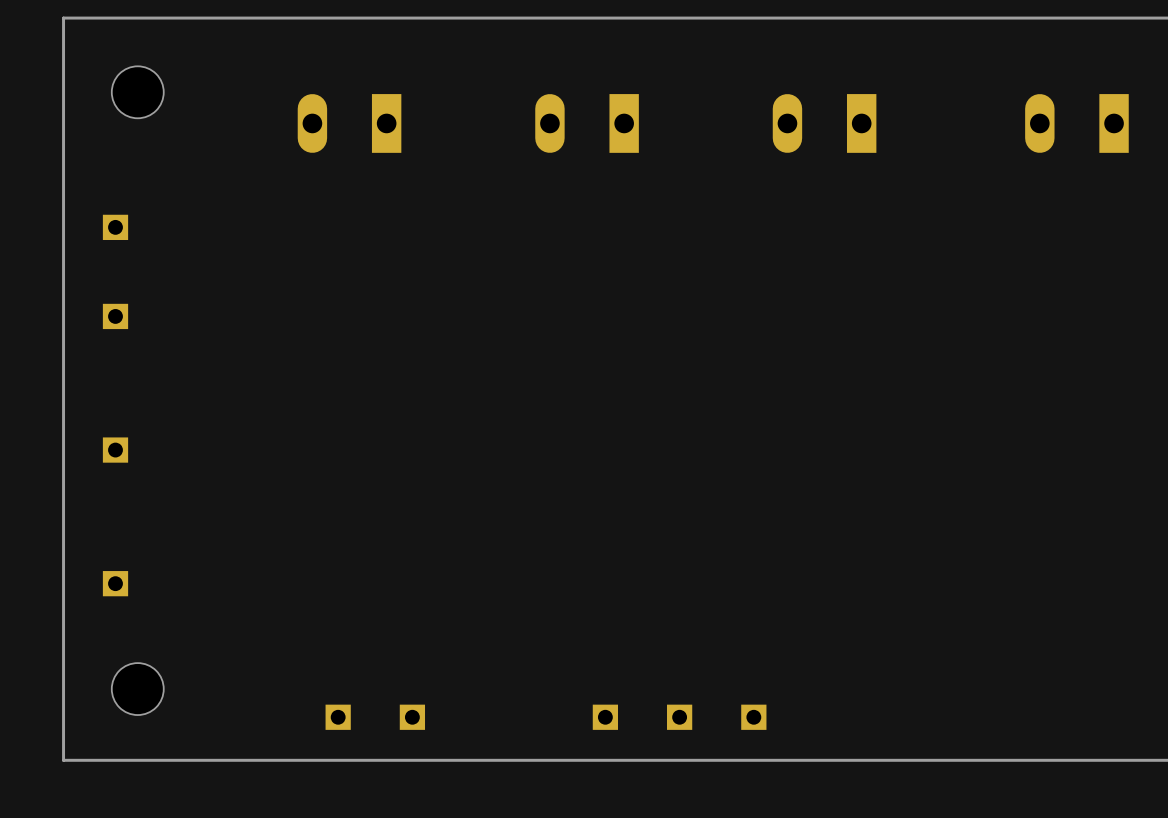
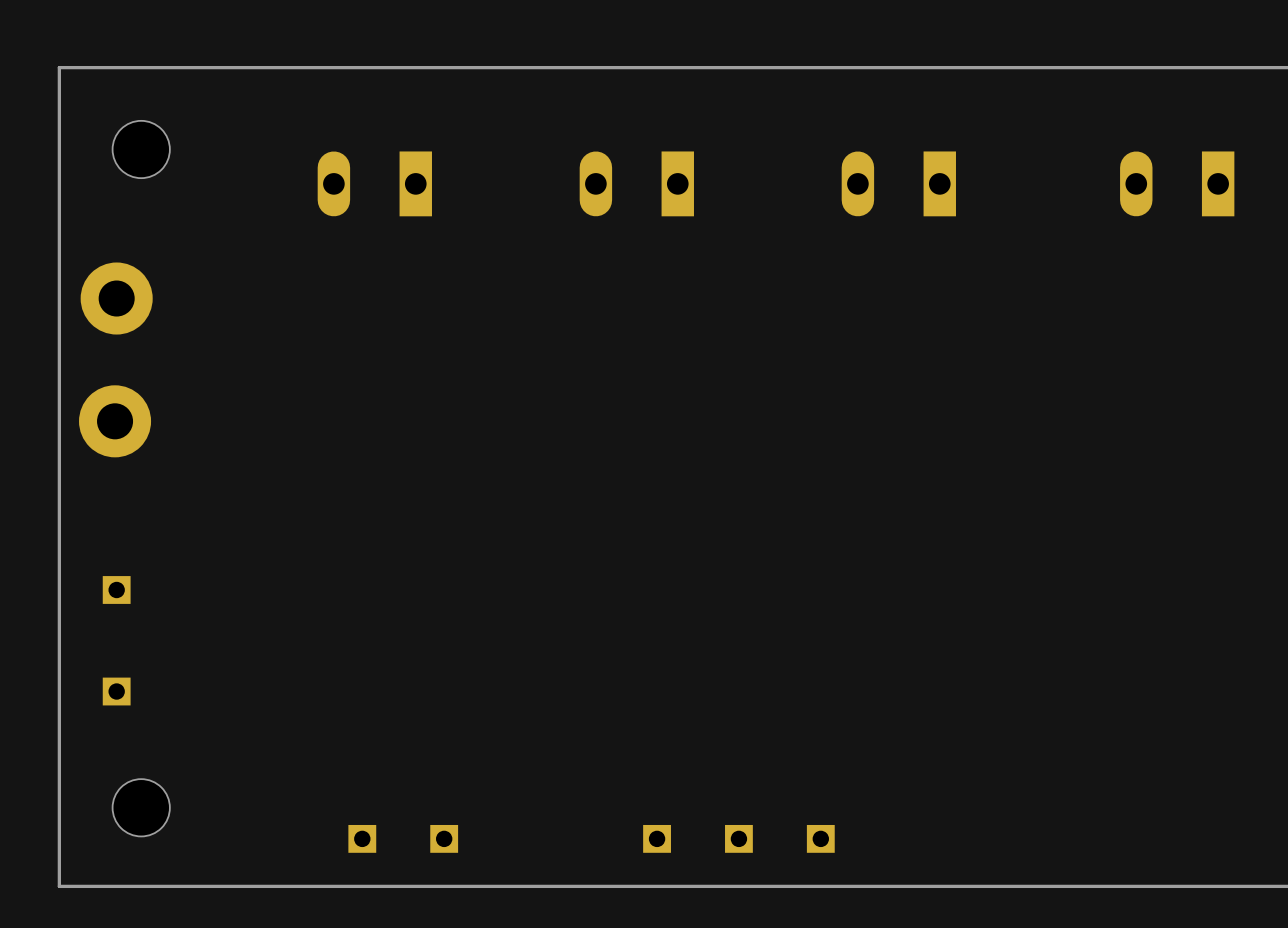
part footprint: [102, 214, 129, 241] -> [80, 262, 153, 335]
part: (115, 316) -> none
part: none -> (115, 421)
part position: (115, 450) -> (116, 589)

